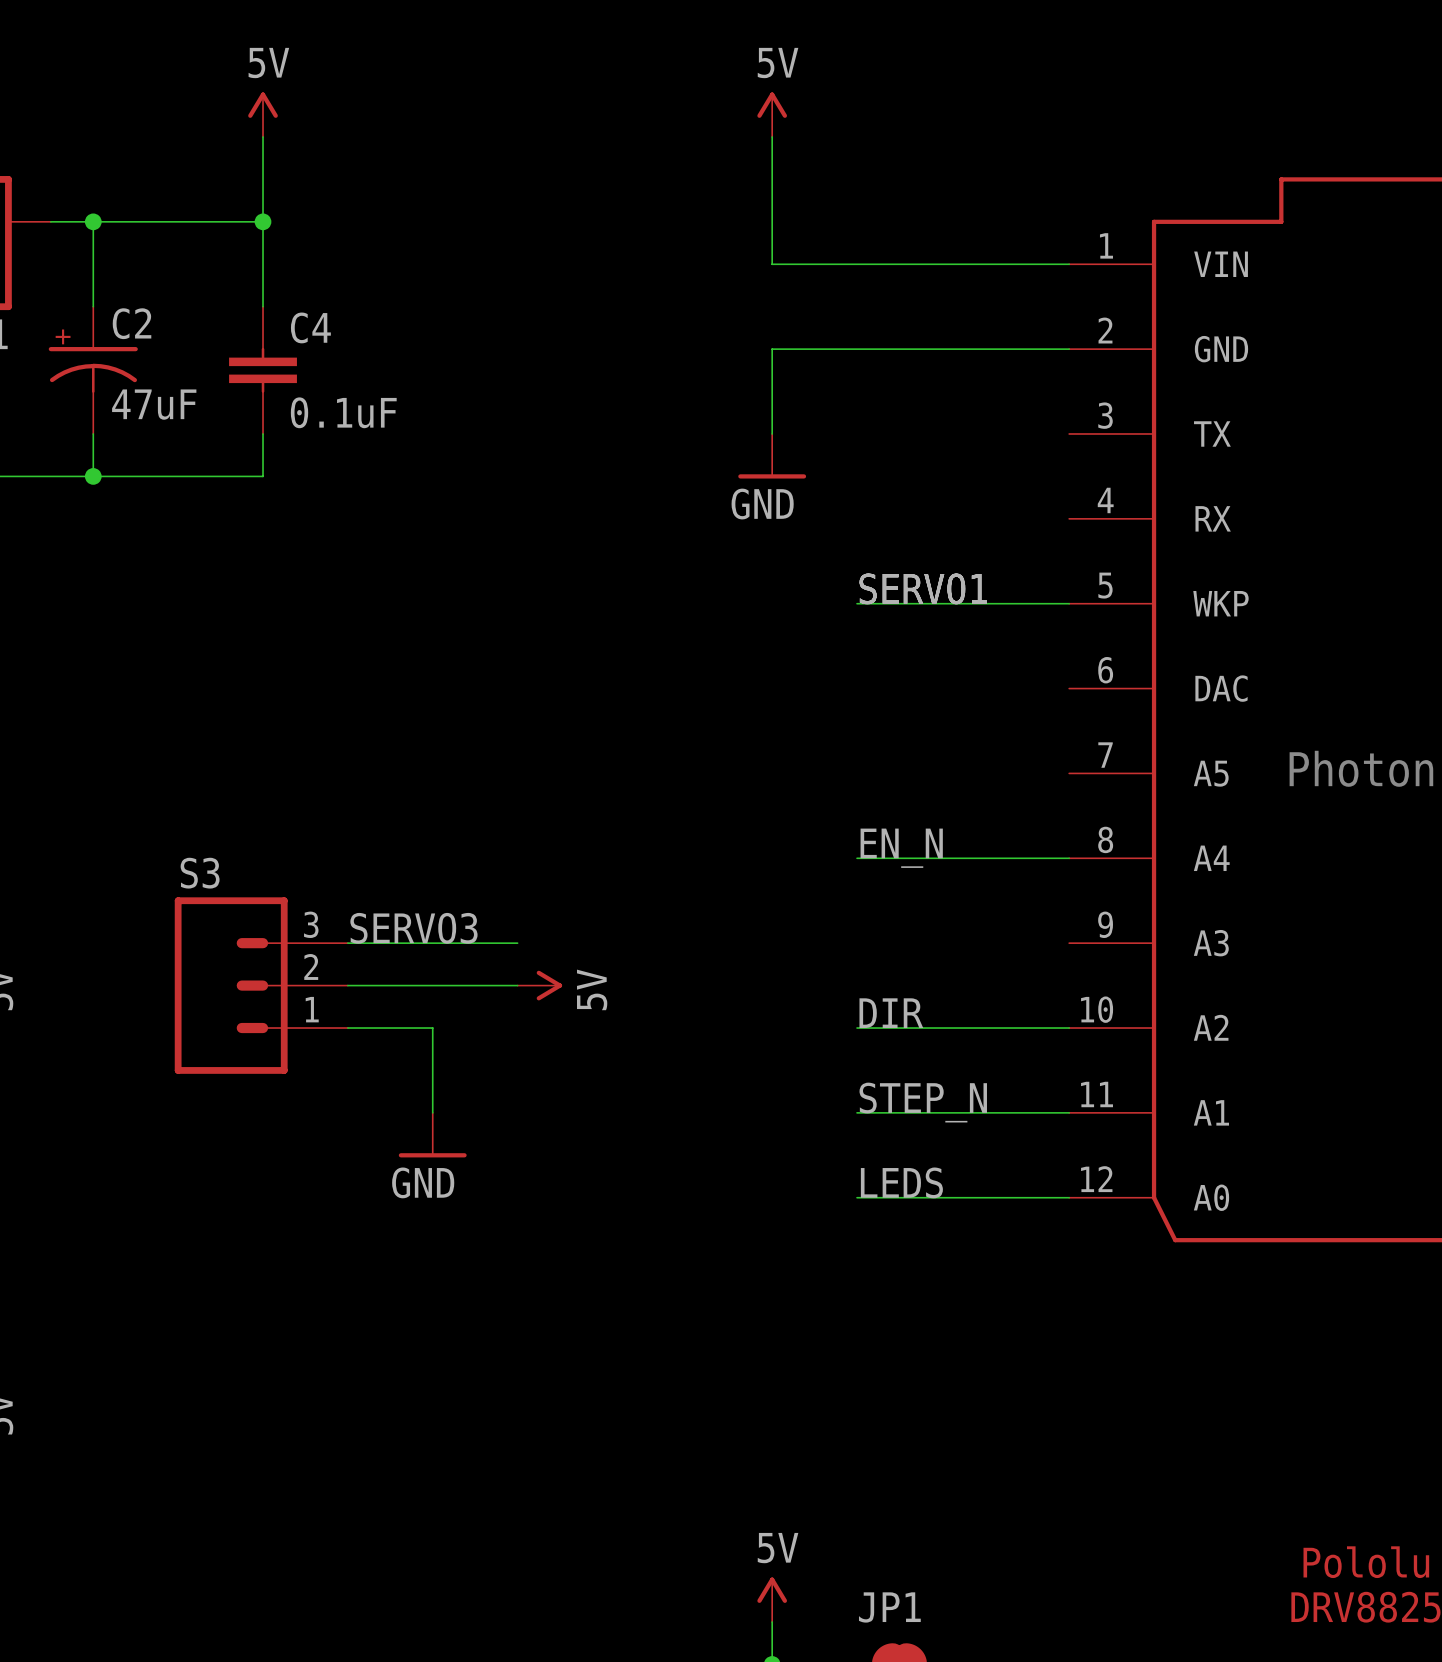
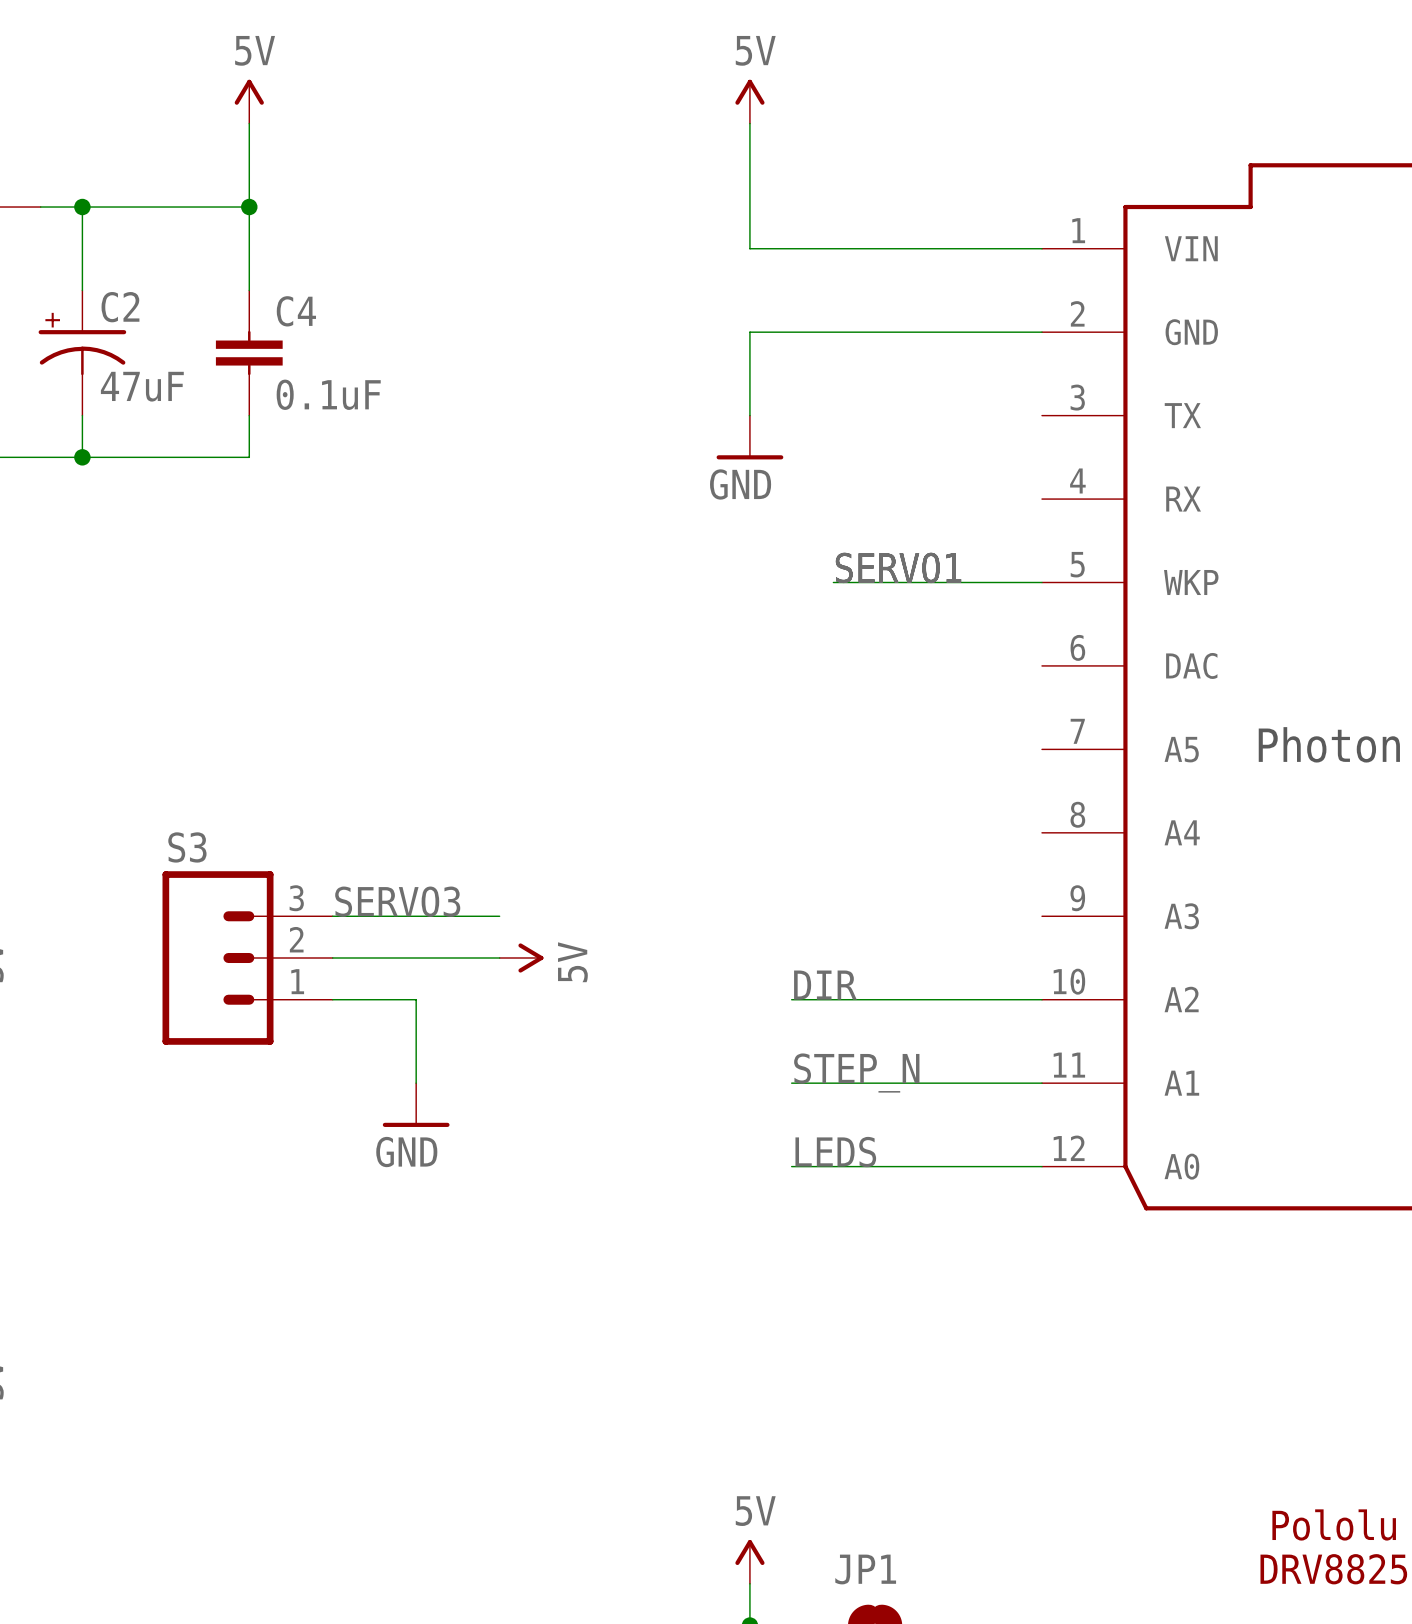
label: EN_N (901, 848) -> none
wire: (857, 858) (1069, 858) -> none
label position: DIR (891, 1013) -> DIR (825, 985)
wire: none -> (791, 999) (833, 999)
label position: STEP_N (923, 1102) -> STEP_N (856, 1073)
wire: none -> (791, 1083) (833, 1083)
label position: LEDS (901, 1182) -> LEDS (835, 1152)
wire: none -> (791, 1166) (833, 1166)

